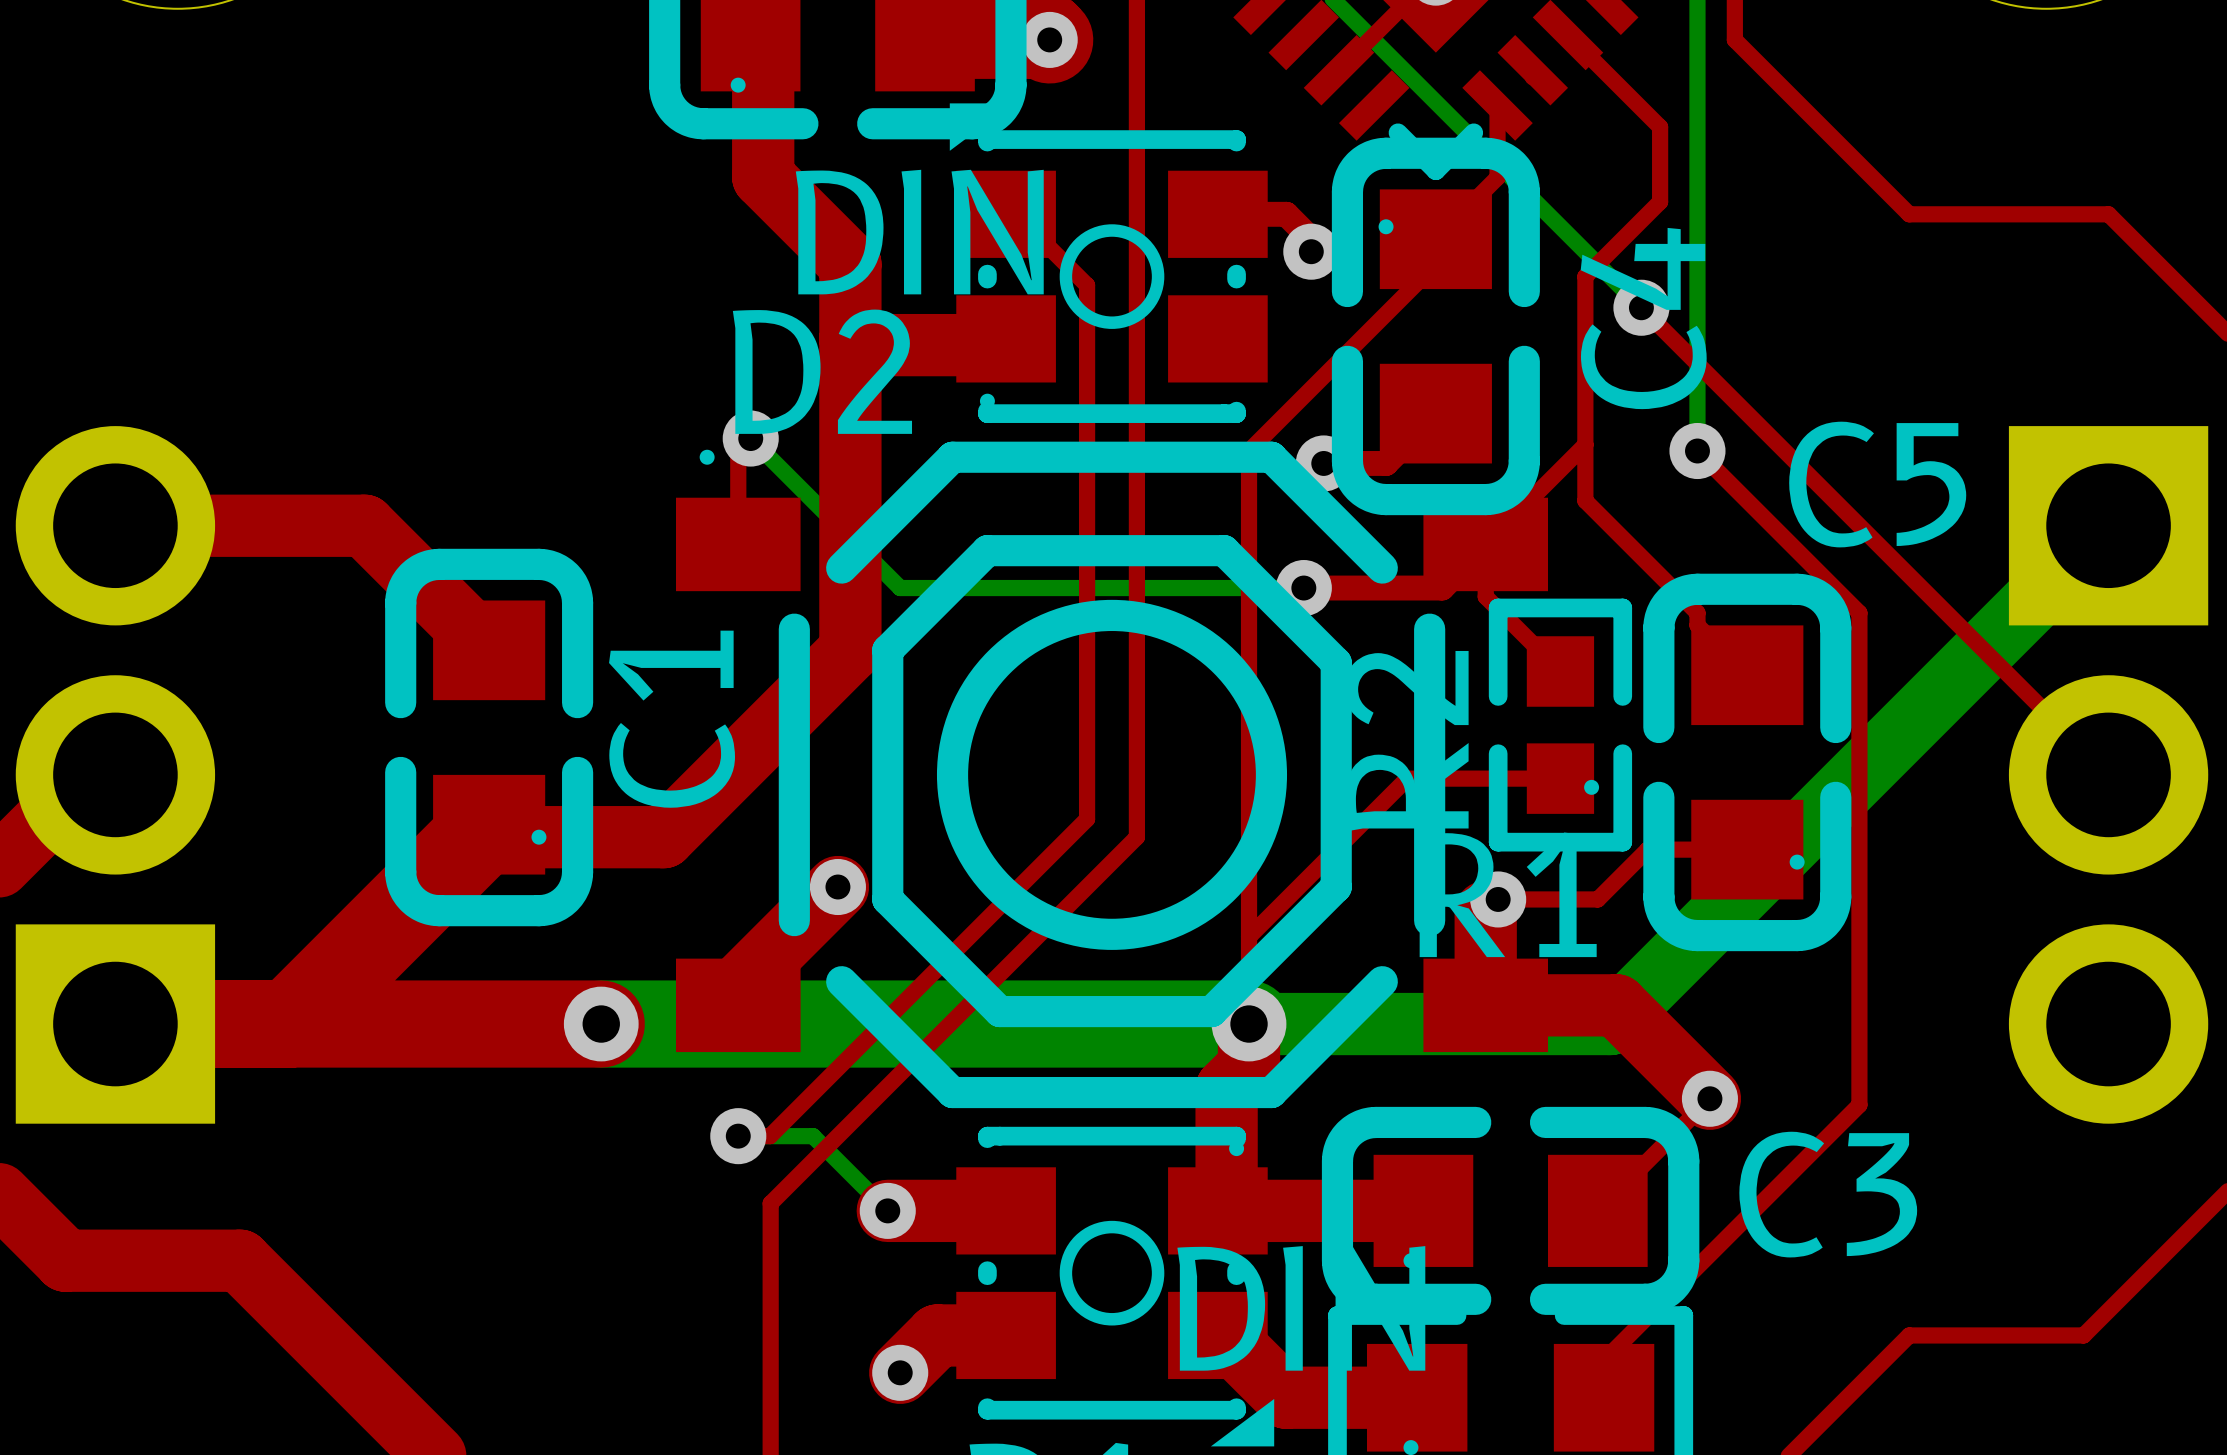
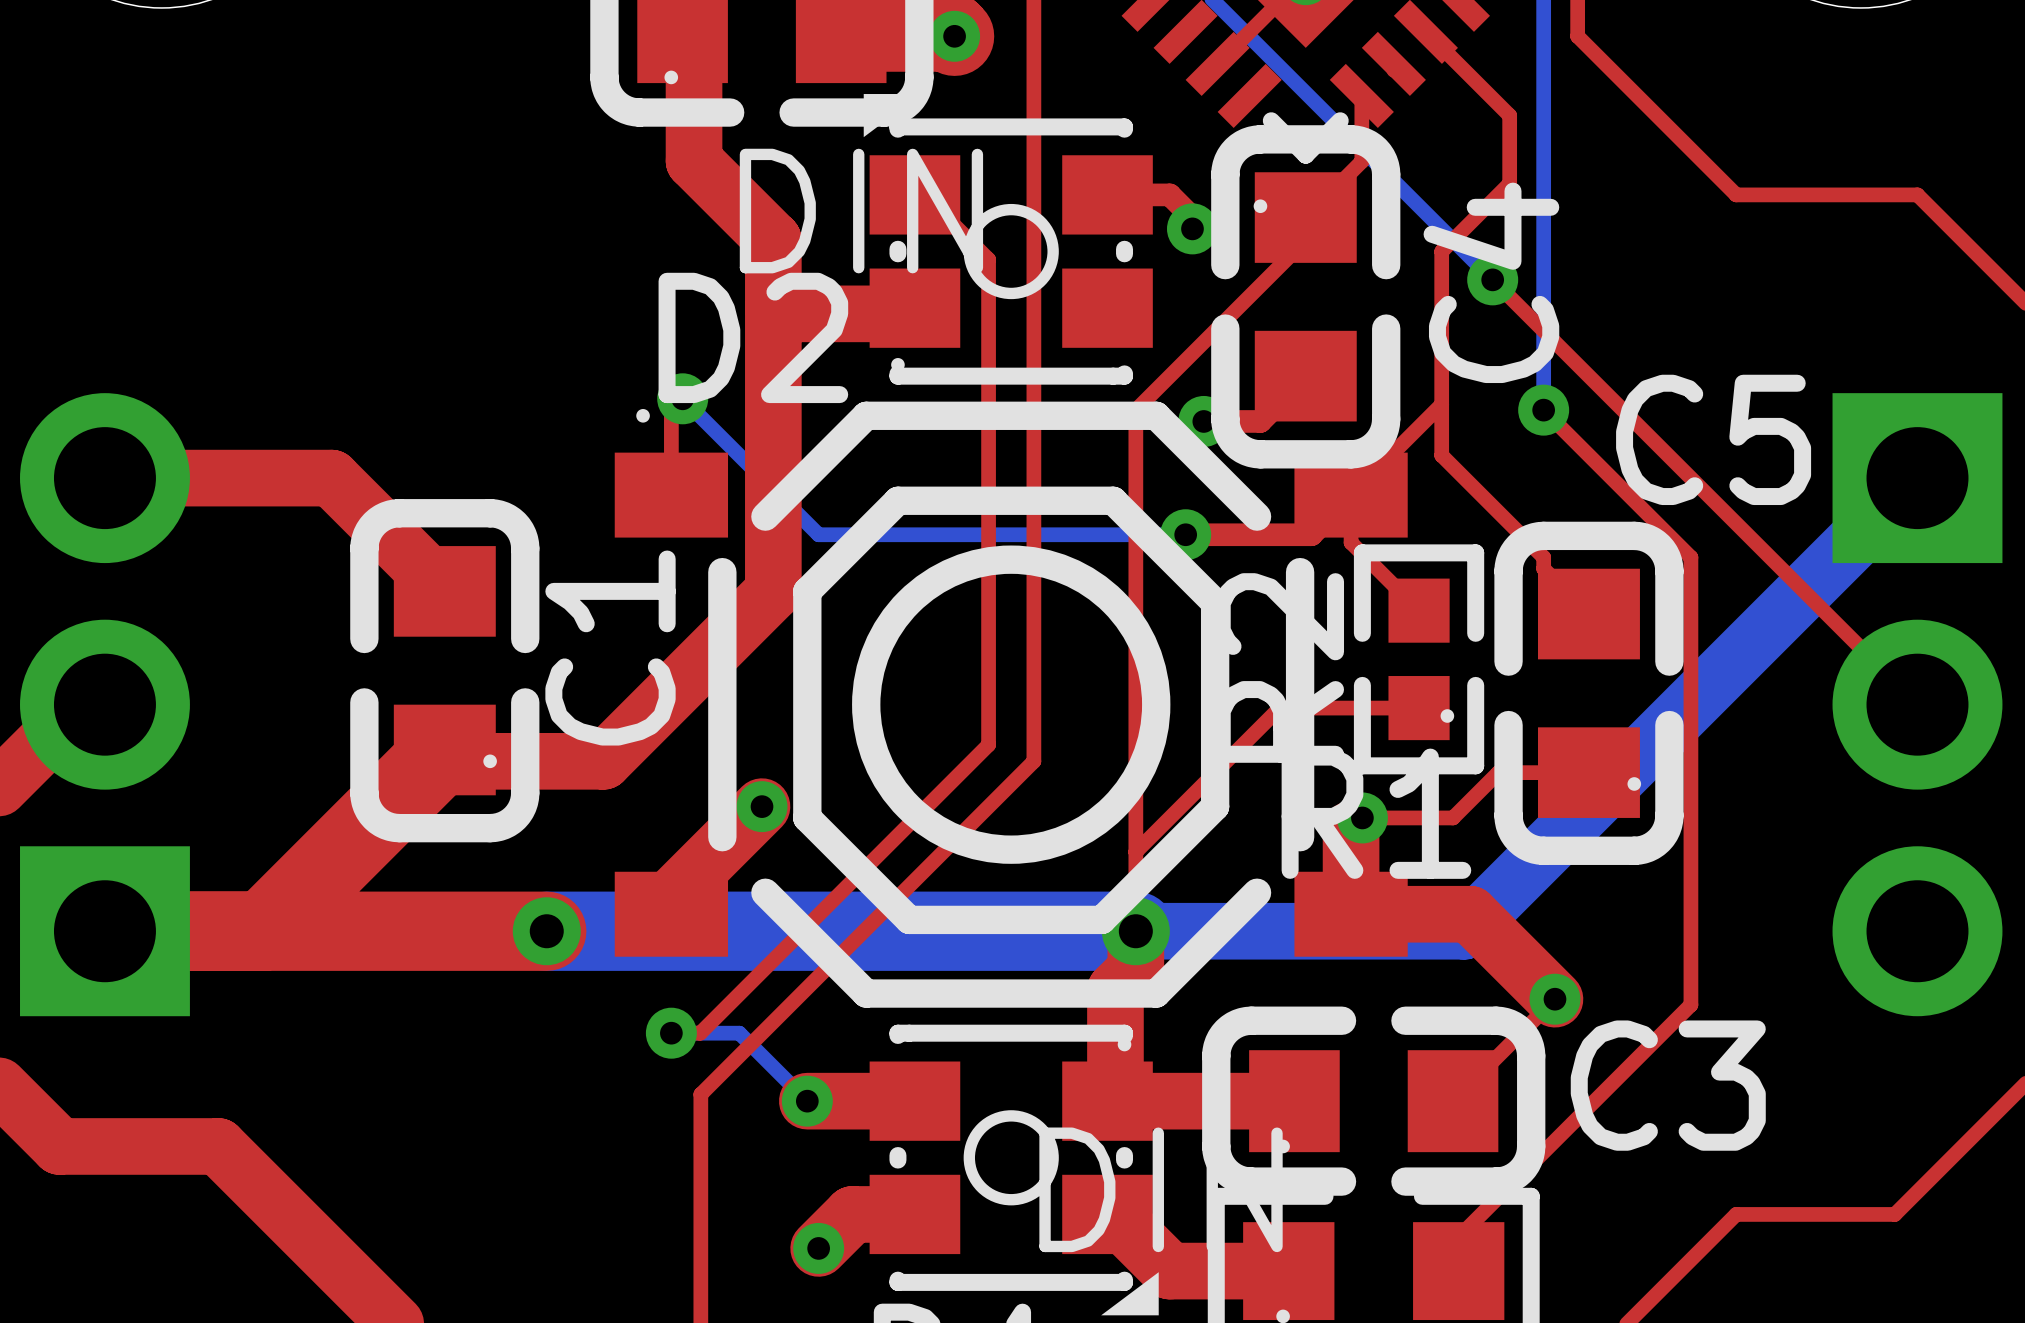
part footprint: [15, 426, 216, 1124] -> [20, 393, 190, 1017]
part footprint: [2008, 426, 2209, 1124] -> [1832, 393, 2003, 1017]

